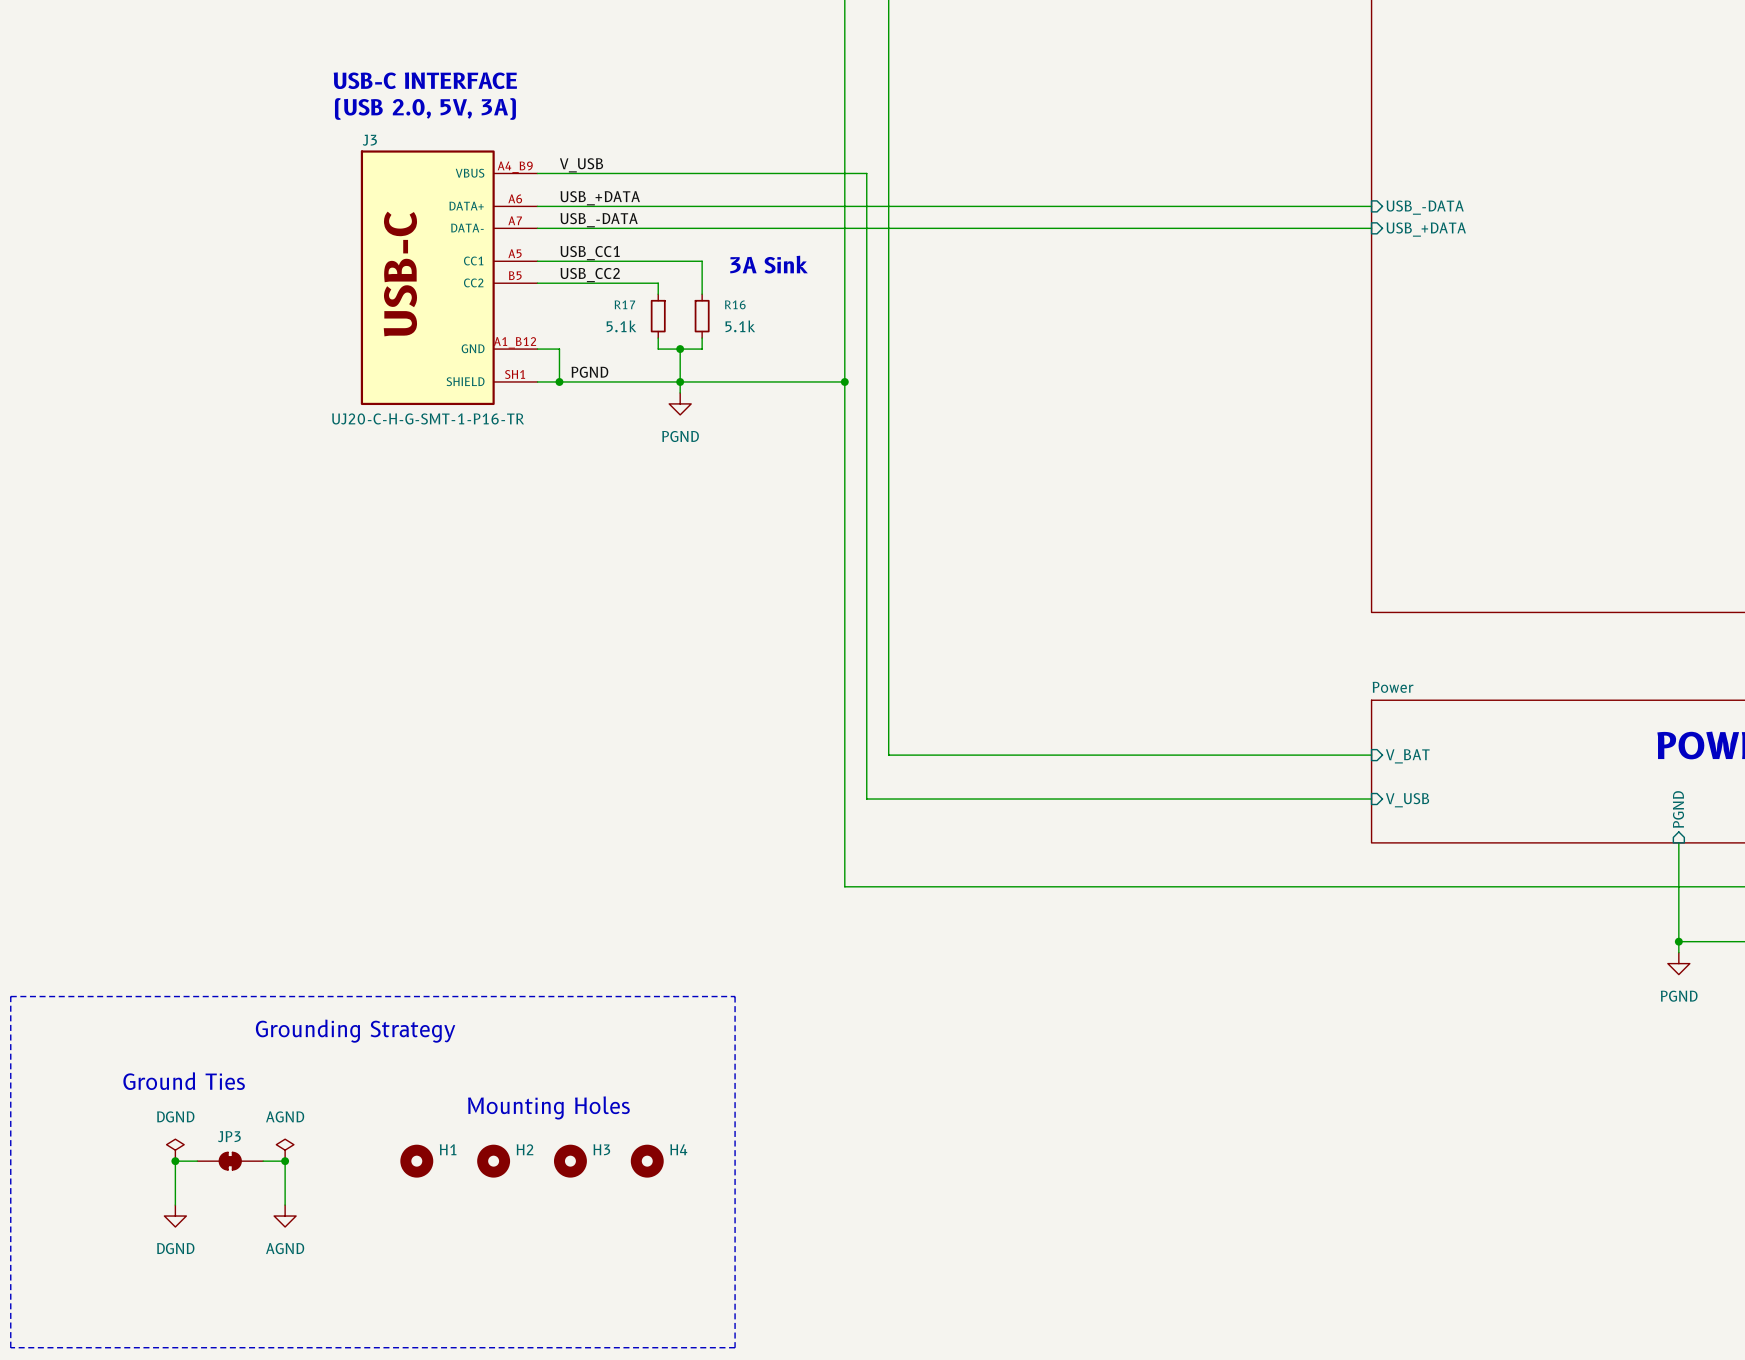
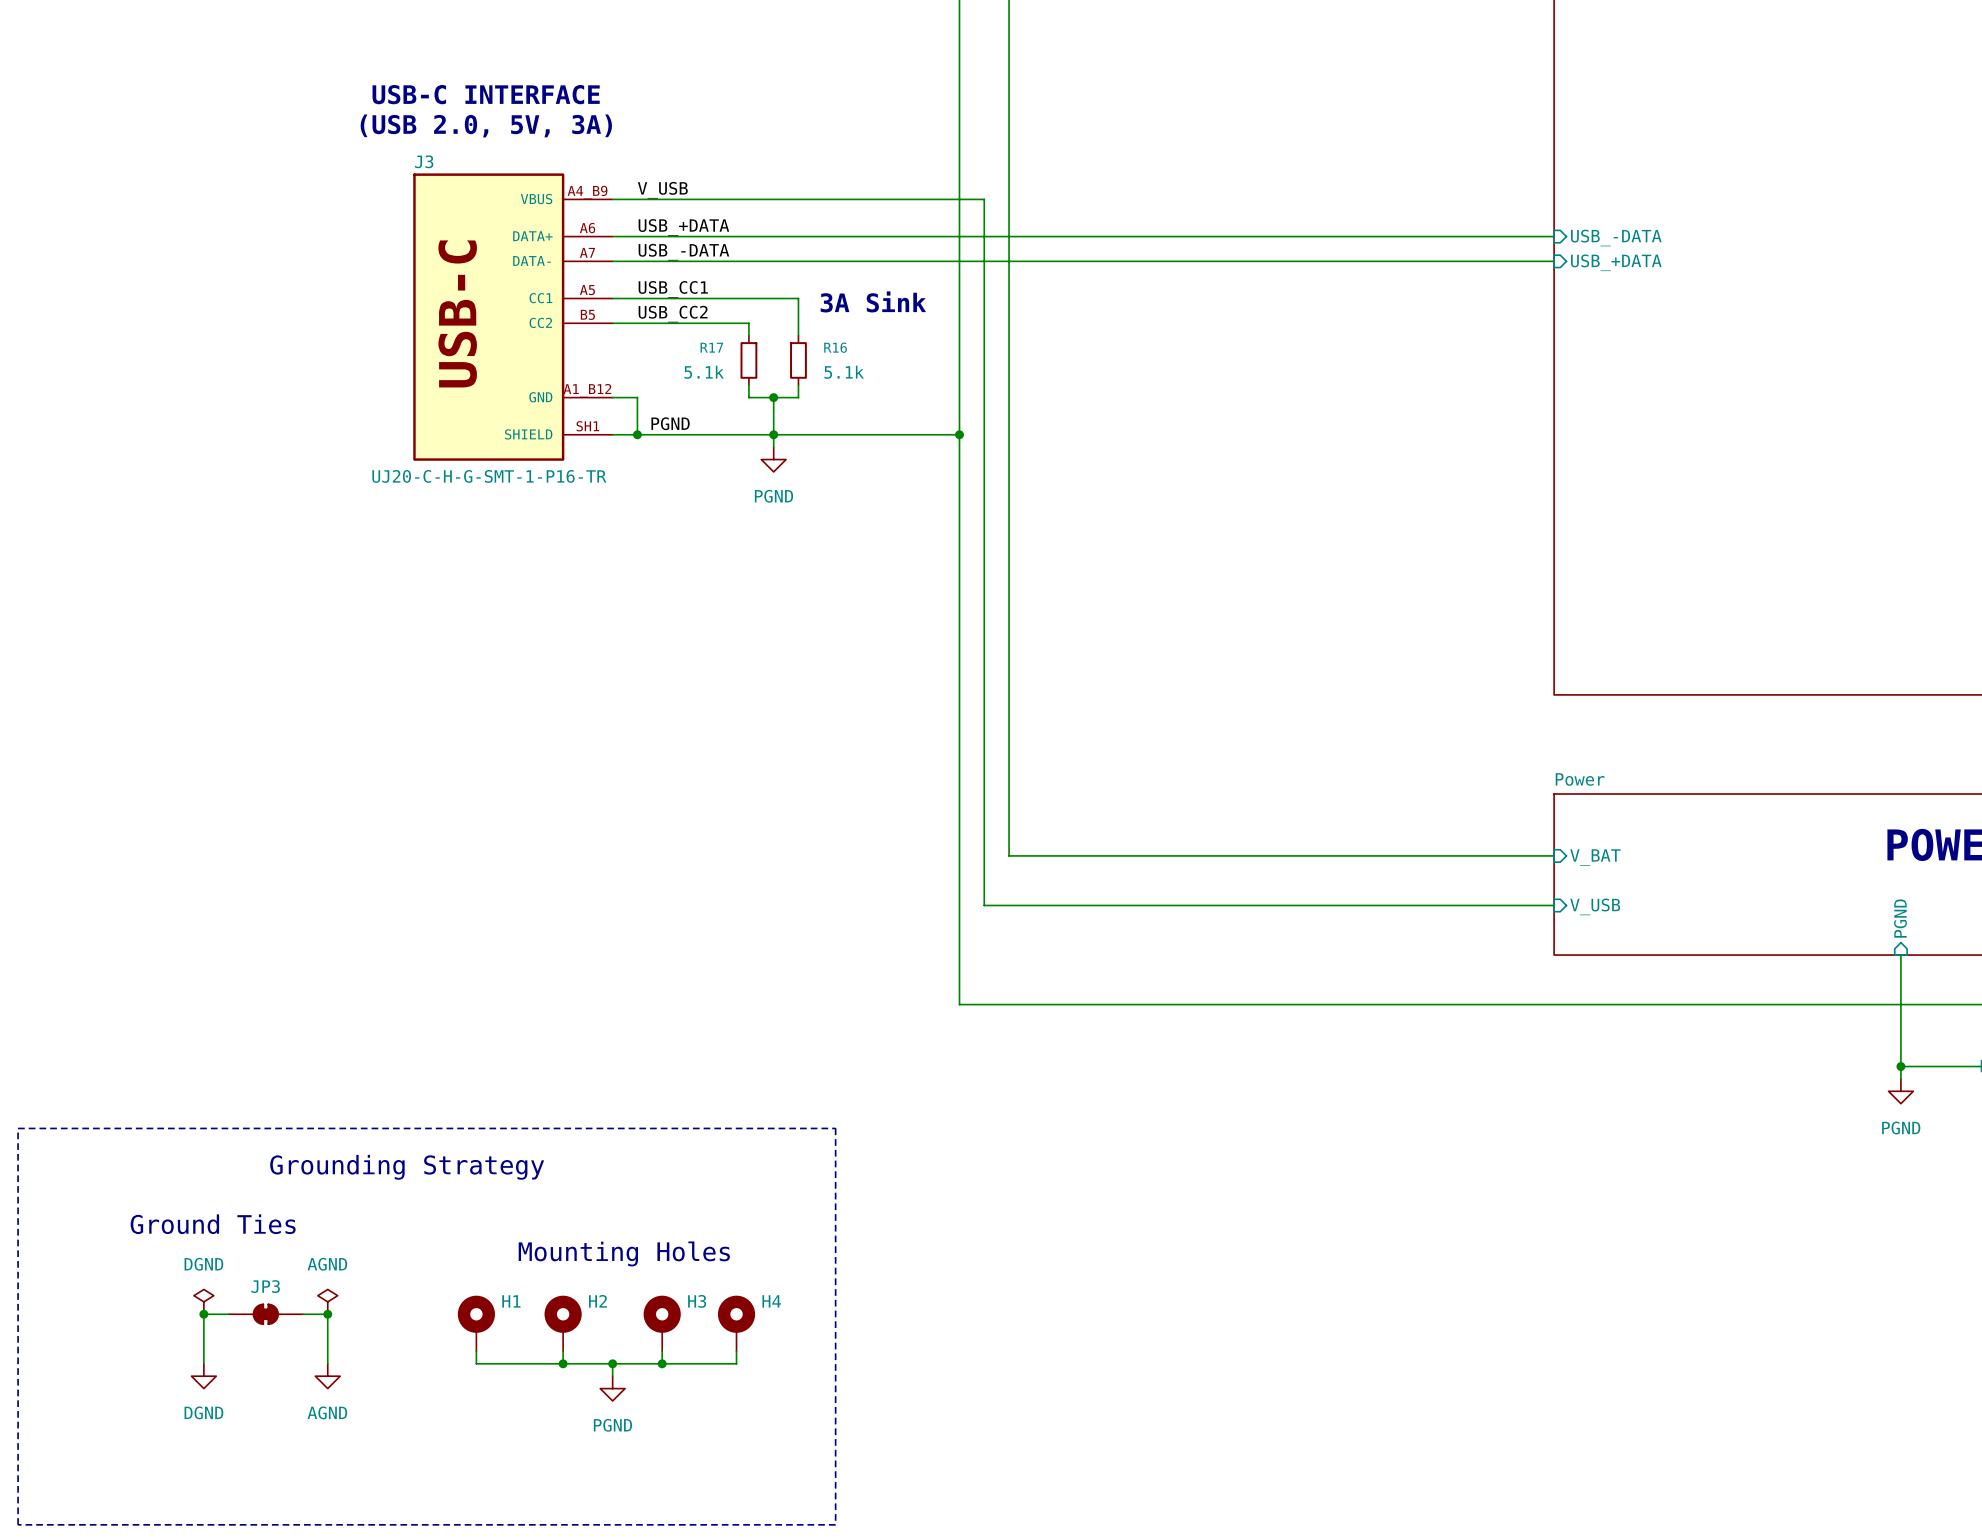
H1 symbol: [400, 1144, 434, 1178] -> [457, 1295, 495, 1352]
H2 symbol: [477, 1144, 511, 1178] -> [544, 1295, 582, 1352]
H3 symbol: [553, 1144, 587, 1178] -> [643, 1295, 681, 1352]
H4 symbol: [630, 1144, 664, 1178] -> [717, 1295, 756, 1352]
wire: none -> (476, 1351) (476, 1363) (736, 1363) (736, 1351)
wire: none -> (563, 1351) (563, 1363)
wire: none -> (662, 1351) (662, 1363)
junction: none -> (563, 1363)
wire: none -> (612, 1363) (612, 1376)
junction: none -> (612, 1363)
junction: none -> (662, 1363)
power symbol: none -> PGND (612, 1388)

